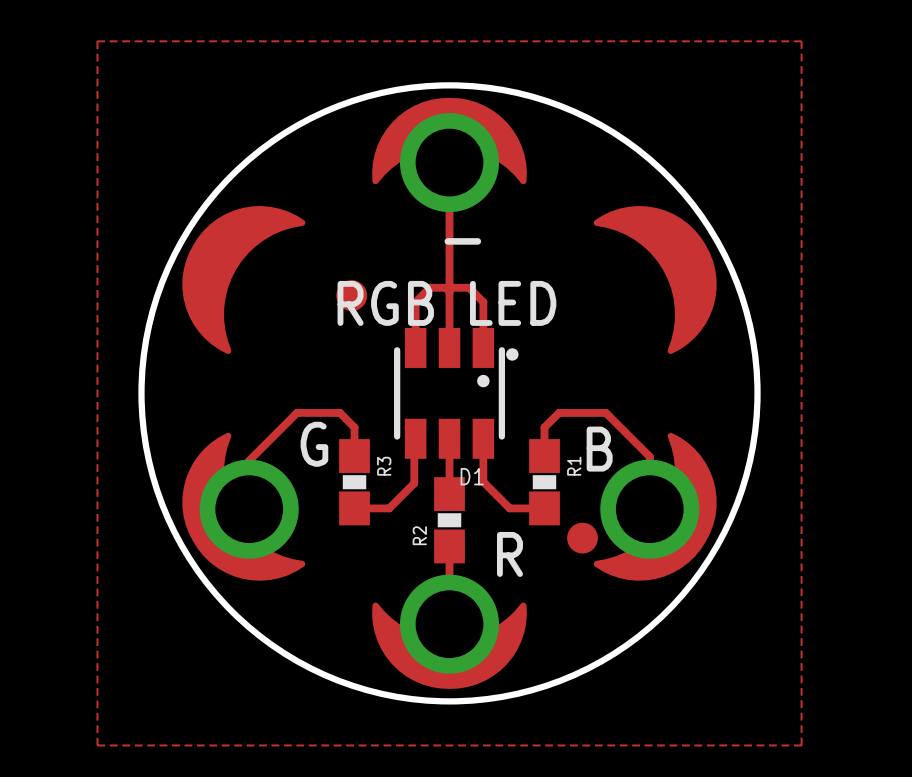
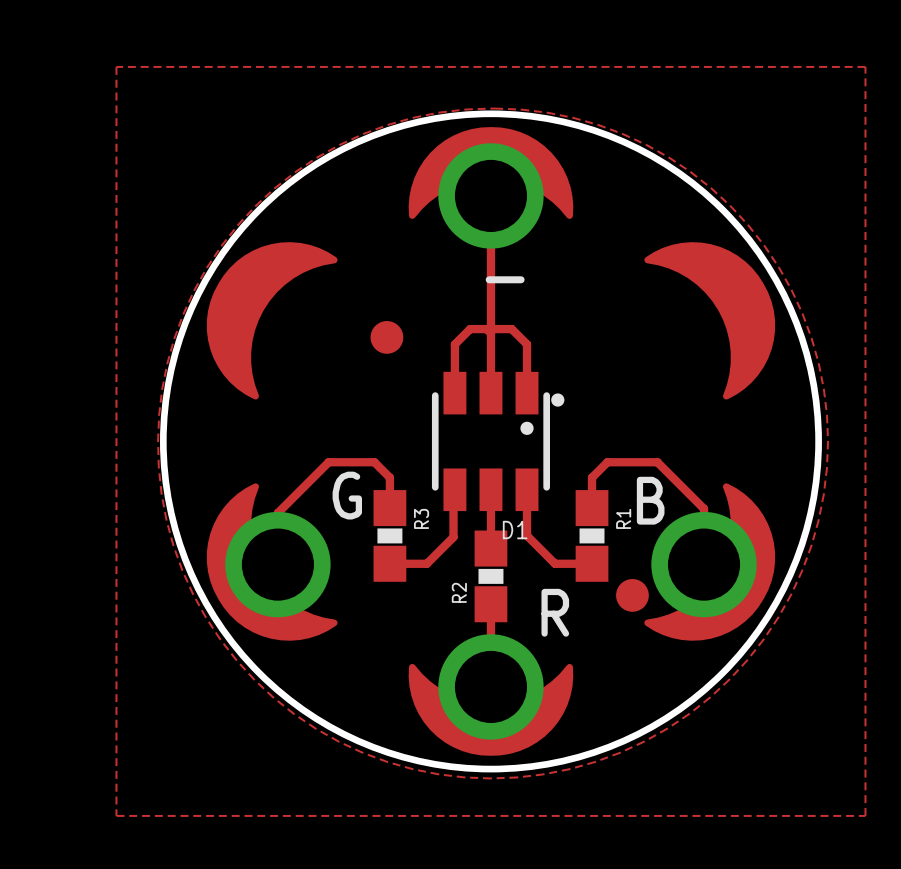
zone outline: none -> (490, 108) (464, 109) (413, 117) (363, 133) (317, 157) (274, 188) (255, 206) (237, 225) (207, 267) (183, 314) (167, 363) (159, 415) (158, 441) (158, 467) (166, 519) (182, 570) (205, 617) (220, 639) (254, 679) (293, 713) (338, 741) (362, 752) (387, 761) (438, 774) (490, 778) (543, 774) (595, 761) (619, 752) (643, 741) (689, 714) (729, 679) (763, 639) (791, 594) (802, 570) (811, 545) (823, 494) (828, 441) (823, 389) (818, 363) (802, 314) (778, 267) (764, 245) (730, 206) (711, 188) (669, 157) (622, 133) (598, 124) (547, 112) (490, 108)
text: RGB LED (446, 303) -> none

